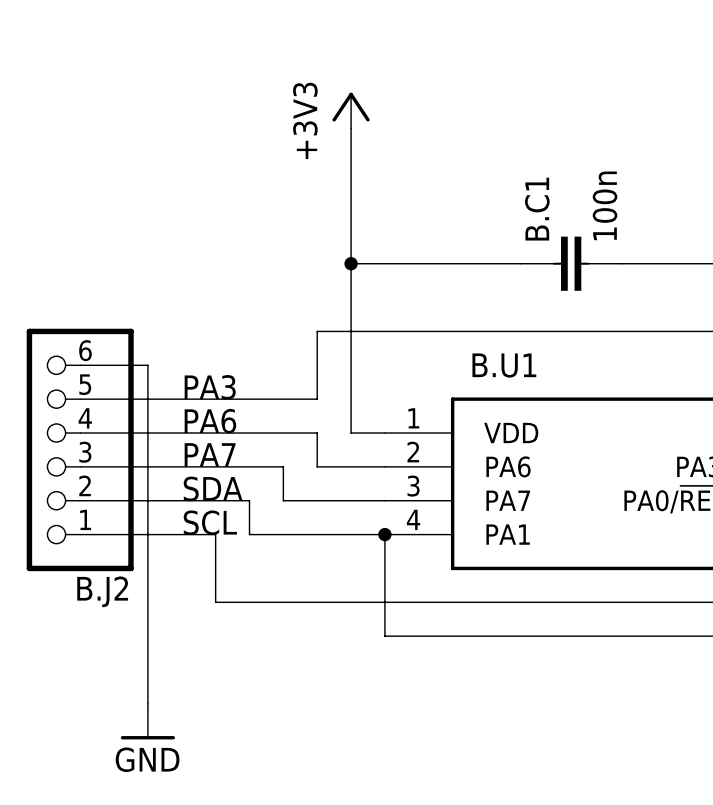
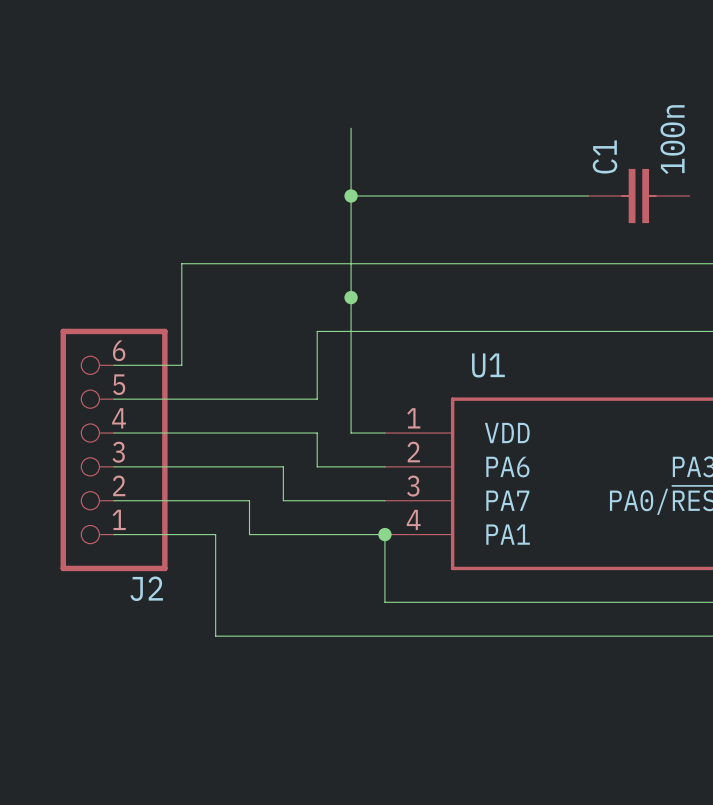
power symbol: +3V3 (351, 110) -> none
wire: none -> (351, 196) (588, 196)
junction: none -> (351, 196)
C1: none -> 100n (638, 196)
junction: (351, 263) -> none
B.C1: 100n (571, 263) -> none
junction: none -> (351, 297)
wire: (80, 365) (114, 365) -> none
wire: (147, 365) (147, 703) -> (147, 365) (181, 365) (181, 263) (351, 263)
B.U1 name: B.U1 (504, 365) -> U1 (488, 365)
label: PA3 (210, 387) -> none
wire: (80, 399) (114, 399) -> none
label: PA6 (210, 421) -> none
wire: (80, 433) (114, 433) -> none
B.J2: (80, 449) -> none
J2: none -> (114, 449)
label: PA7 (210, 455) -> none
wire: (80, 466) (114, 466) -> none
label: SDA (213, 488) -> none
wire: (80, 500) (114, 500) -> none
label: SCL (210, 522) -> none
wire: (80, 534) (114, 534) -> none
wire: (215, 602) (384, 602) (384, 636) -> (215, 602) (215, 636) (384, 636)
power symbol: GND (147, 721) -> none

